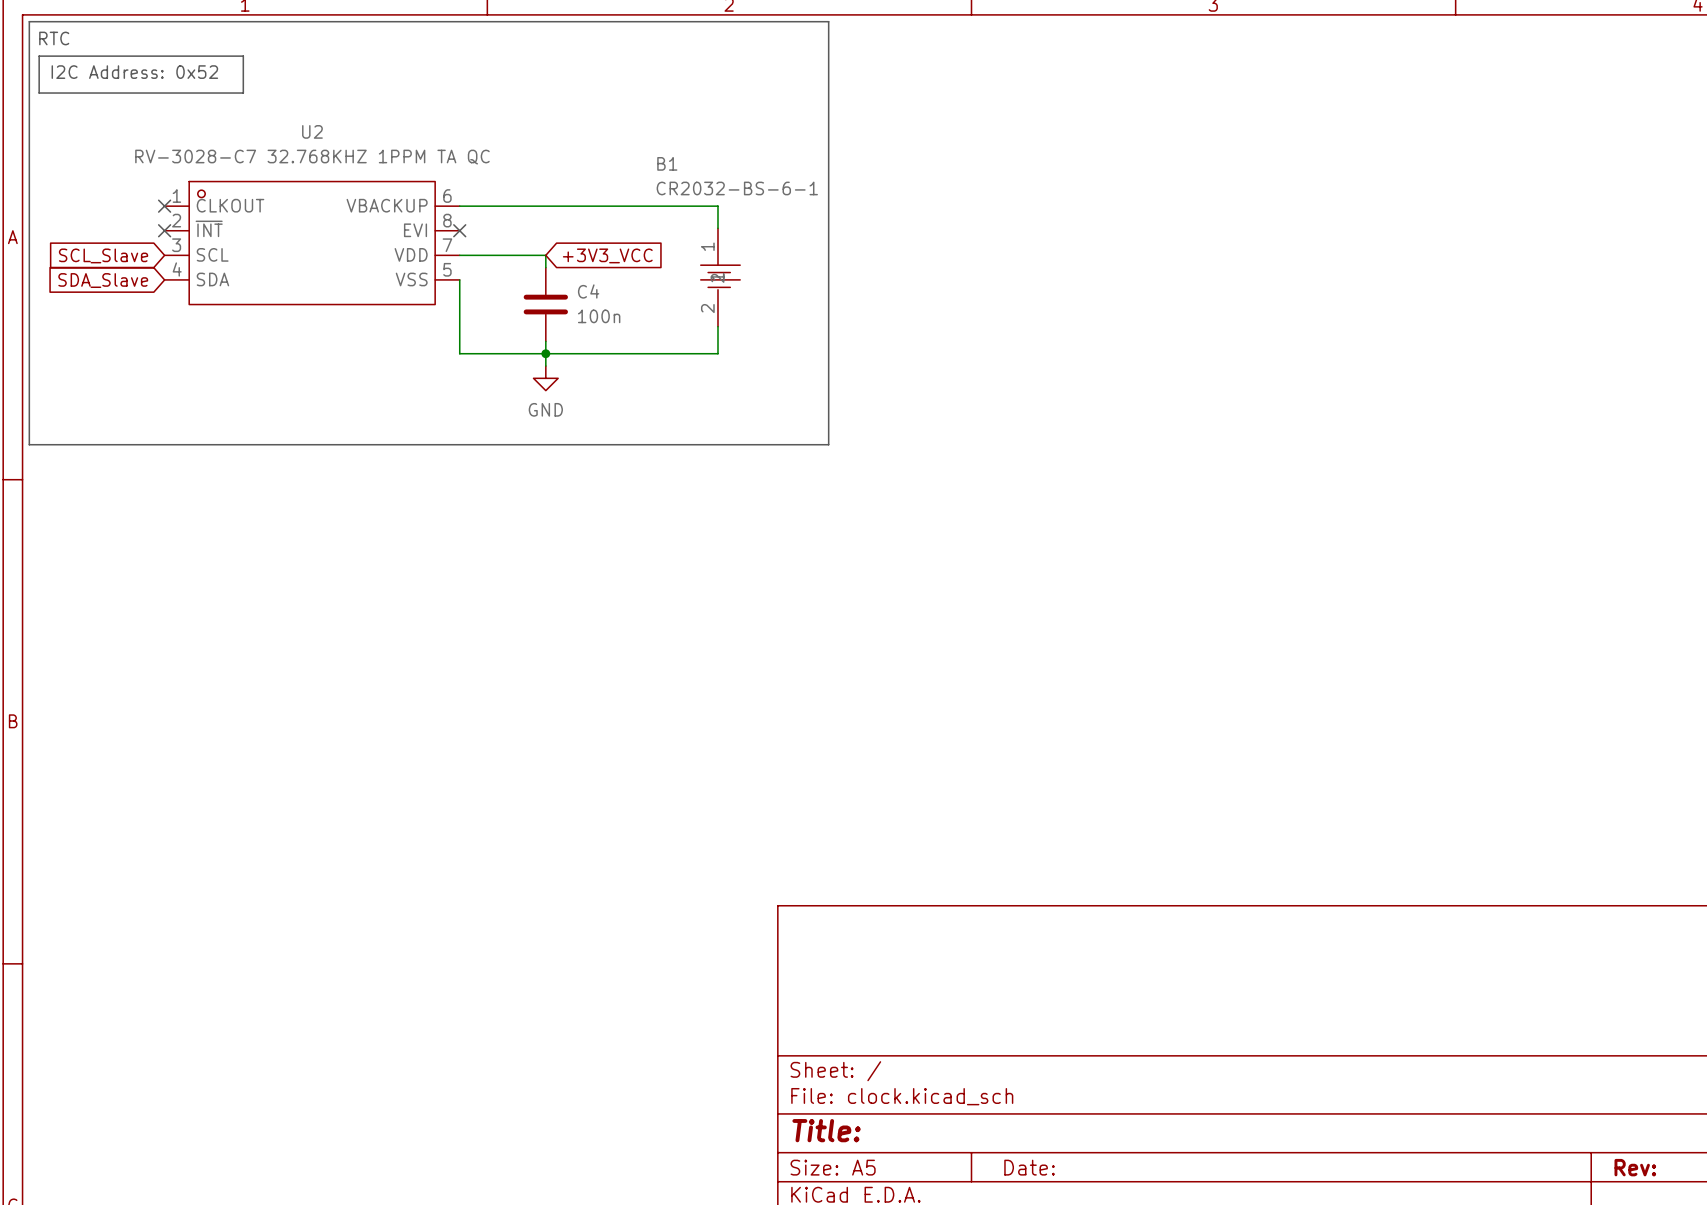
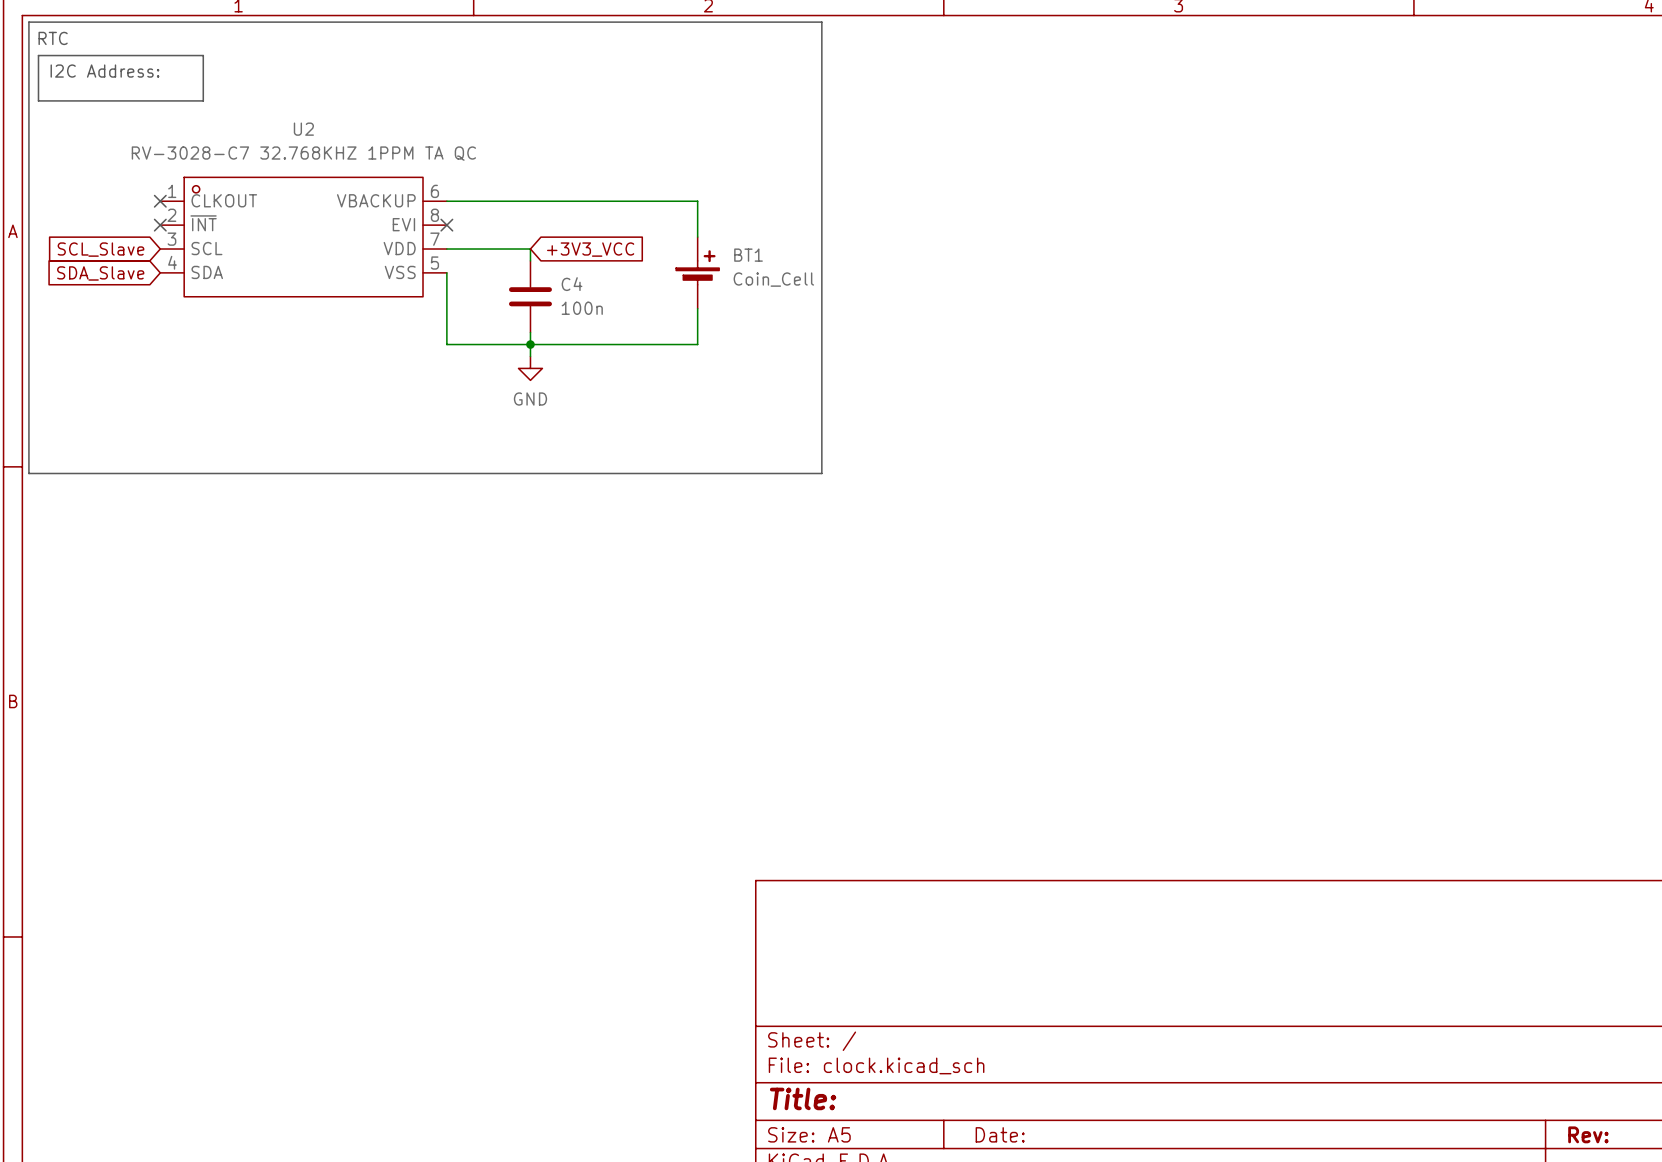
line: (828, 21) (828, 444) (29, 444) -> (805, 22) (821, 22) (821, 473) (28, 473) (28, 432)
line: (208, 56) (243, 56) (243, 93) (39, 93) -> (203, 55) (203, 100) (38, 100) (38, 91)
text: I2C Address: 0x52 (134, 72) -> I2C Address: (104, 71)
B1: CR2032-BS-6-1 (720, 277) -> none
BT1: none -> Coin_Cell (697, 272)

